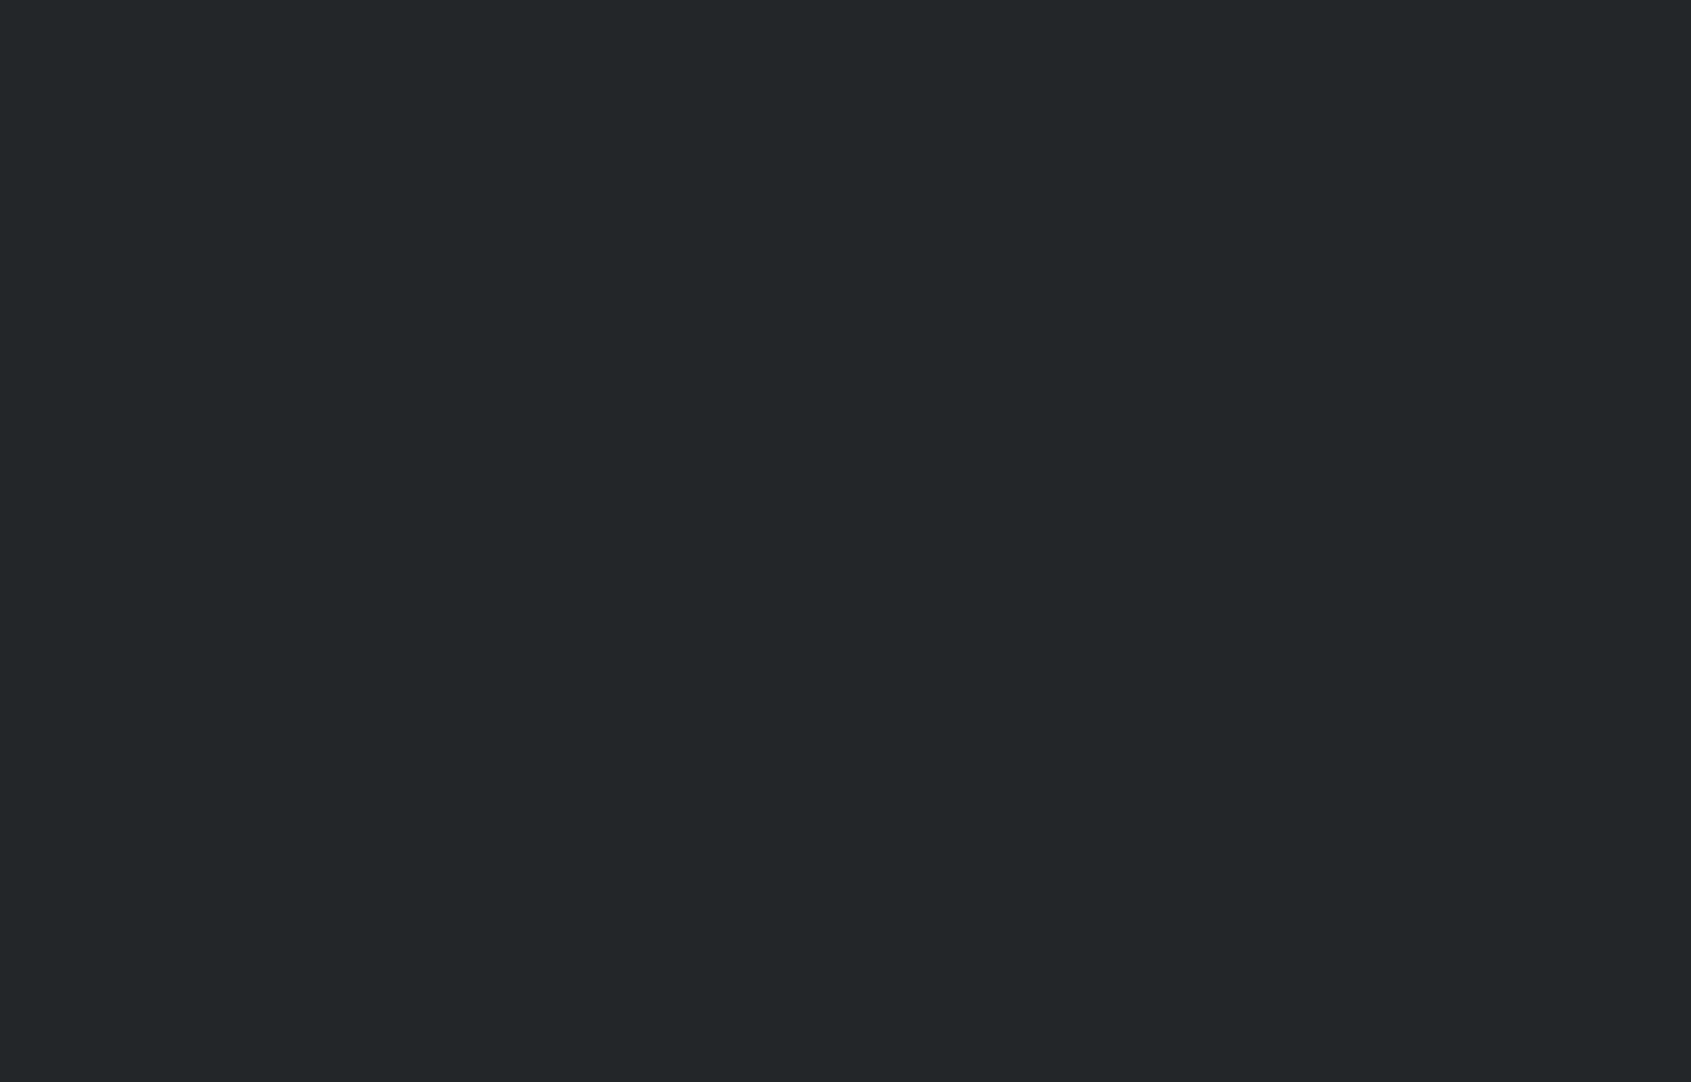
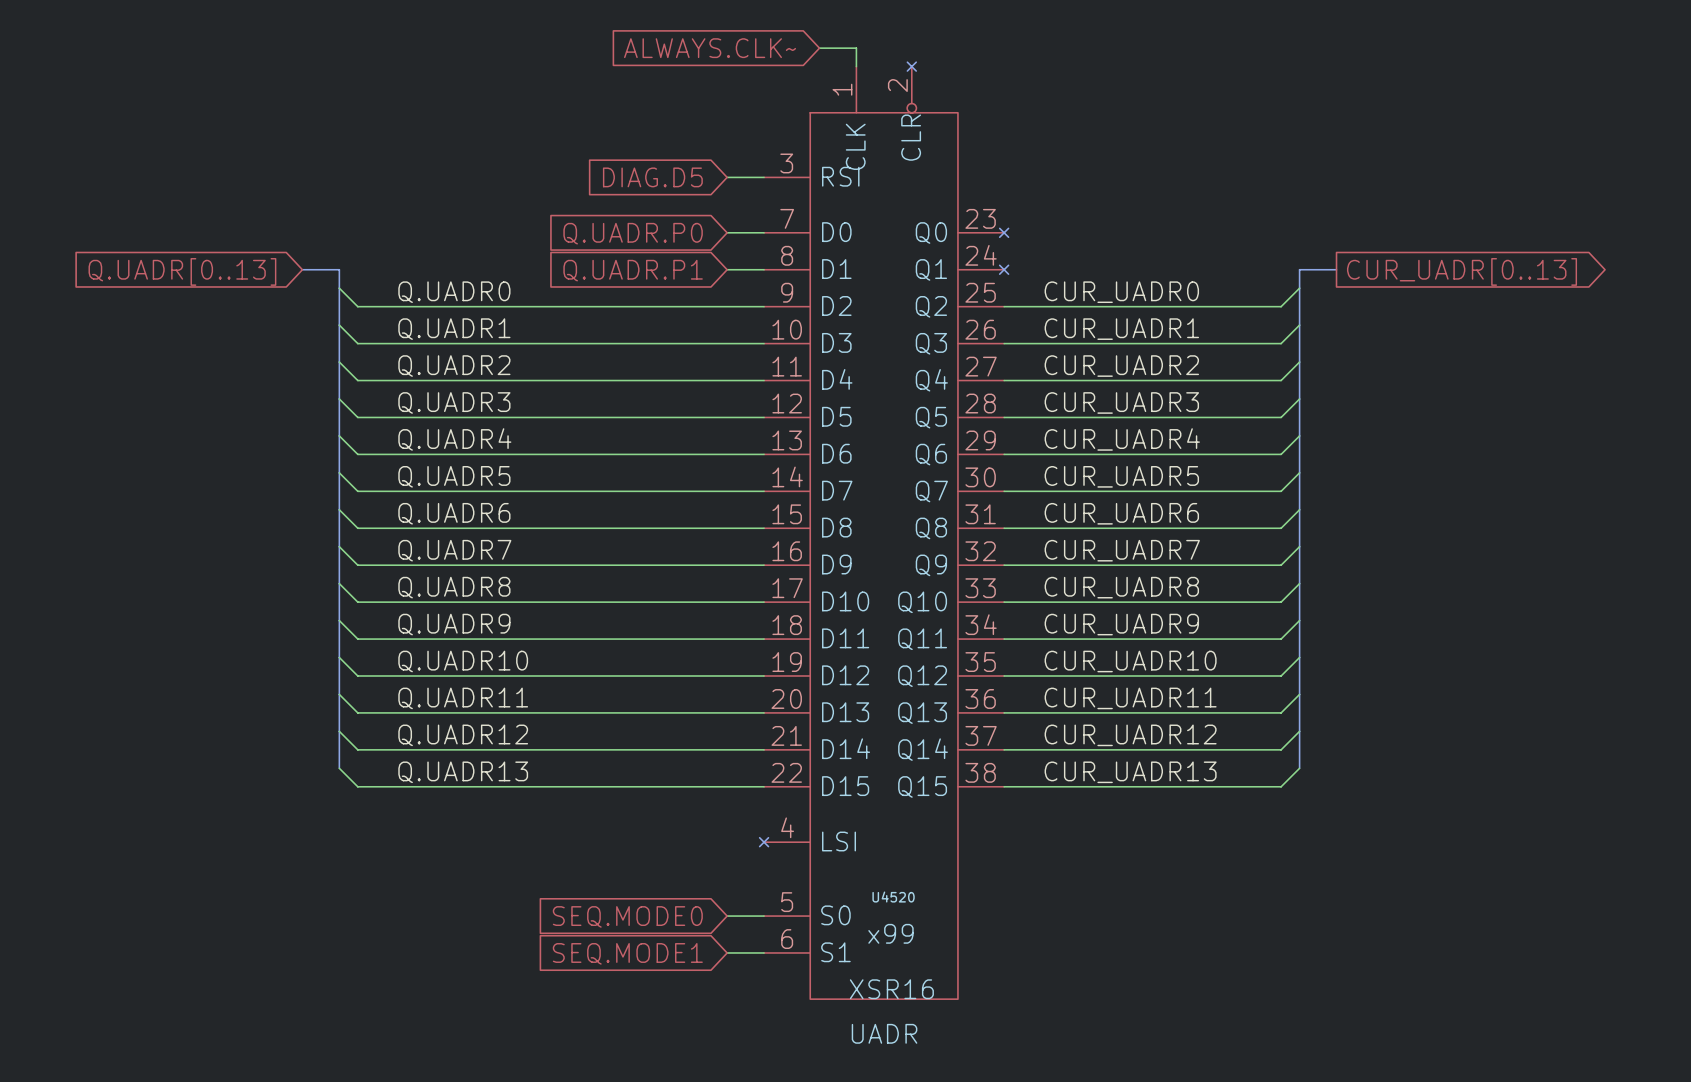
global label: none -> ALWAYS.CLK~ (710, 48)
wire: none -> (819, 48) (856, 48) (856, 66)
no-connect mark: none -> (911, 66)
global label: none -> DIAG.D5 (652, 177)
wire: none -> (727, 177) (764, 177)
wire: none -> (727, 232) (764, 232)
no-connect mark: none -> (1004, 232)
global label: none -> Q.UADR.P0 (633, 233)
bus: none -> (302, 269) (339, 269) (339, 768)
wire: none -> (727, 269) (764, 269)
no-connect mark: none -> (1004, 269)
bus: none -> (1336, 269) (1299, 269) (1299, 768)
global label: none -> Q.UADR.P1 (633, 270)
global label: none -> Q.UADR[0..13] (182, 271)
global label: none -> CUR_UADR[0..13] (1462, 271)
wire: none -> (339, 288) (357, 306) (764, 306)
wire: none -> (1299, 288) (1281, 306) (1004, 306)
label: none -> Q.UADR0 (454, 292)
label: none -> CUR_UADR0 (1121, 292)
wire: none -> (339, 325) (357, 343) (764, 343)
wire: none -> (1299, 325) (1281, 343) (1004, 343)
label: none -> Q.UADR1 (454, 329)
label: none -> CUR_UADR1 (1121, 329)
wire: none -> (339, 362) (357, 380) (764, 380)
wire: none -> (1299, 362) (1281, 380) (1004, 380)
label: none -> Q.UADR2 (454, 366)
label: none -> CUR_UADR2 (1121, 366)
wire: none -> (339, 399) (357, 417) (764, 417)
wire: none -> (1299, 399) (1281, 417) (1004, 417)
label: none -> Q.UADR3 (454, 402)
label: none -> CUR_UADR3 (1121, 402)
wire: none -> (339, 435) (357, 454) (764, 454)
wire: none -> (1299, 435) (1281, 454) (1004, 454)
label: none -> Q.UADR4 (454, 439)
label: none -> CUR_UADR4 (1122, 439)
wire: none -> (339, 472) (357, 491) (764, 491)
wire: none -> (1299, 472) (1281, 491) (1004, 491)
label: none -> Q.UADR5 (454, 476)
label: none -> CUR_UADR5 (1121, 476)
wire: none -> (339, 509) (357, 528) (764, 528)
wire: none -> (1299, 509) (1281, 528) (1004, 528)
label: none -> Q.UADR6 (454, 513)
label: none -> CUR_UADR6 (1121, 513)
U4520: none -> XSR16 (884, 532)
wire: none -> (339, 546) (357, 565) (764, 565)
wire: none -> (1299, 546) (1281, 565) (1004, 565)
label: none -> Q.UADR7 (454, 550)
label: none -> CUR_UADR7 (1122, 550)
wire: none -> (339, 583) (357, 602) (764, 602)
wire: none -> (1299, 583) (1281, 602) (1004, 602)
label: none -> Q.UADR8 (454, 587)
label: none -> CUR_UADR8 (1121, 587)
wire: none -> (339, 620) (357, 639) (764, 639)
wire: none -> (1299, 620) (1281, 639) (1004, 639)
label: none -> Q.UADR9 (454, 624)
label: none -> CUR_UADR9 (1121, 624)
wire: none -> (339, 657) (357, 675) (764, 675)
wire: none -> (1299, 657) (1281, 675) (1004, 675)
label: none -> Q.UADR10 (463, 661)
label: none -> CUR_UADR10 (1130, 661)
wire: none -> (339, 694) (357, 712) (764, 712)
wire: none -> (1299, 694) (1281, 712) (1004, 712)
label: none -> Q.UADR11 (463, 698)
label: none -> CUR_UADR11 (1130, 698)
wire: none -> (339, 731) (357, 749) (764, 749)
wire: none -> (1299, 731) (1281, 749) (1004, 749)
label: none -> Q.UADR12 (463, 735)
label: none -> CUR_UADR12 (1130, 735)
wire: none -> (339, 768) (357, 786) (764, 786)
wire: none -> (1299, 768) (1281, 786) (1004, 786)
label: none -> Q.UADR13 (463, 772)
label: none -> CUR_UADR13 (1130, 772)
no-connect mark: none -> (764, 842)
global label: none -> SEQ.MODE0 (627, 916)
wire: none -> (727, 916) (764, 916)
wire: none -> (727, 952) (764, 952)
global label: none -> SEQ.MODE1 (627, 953)

